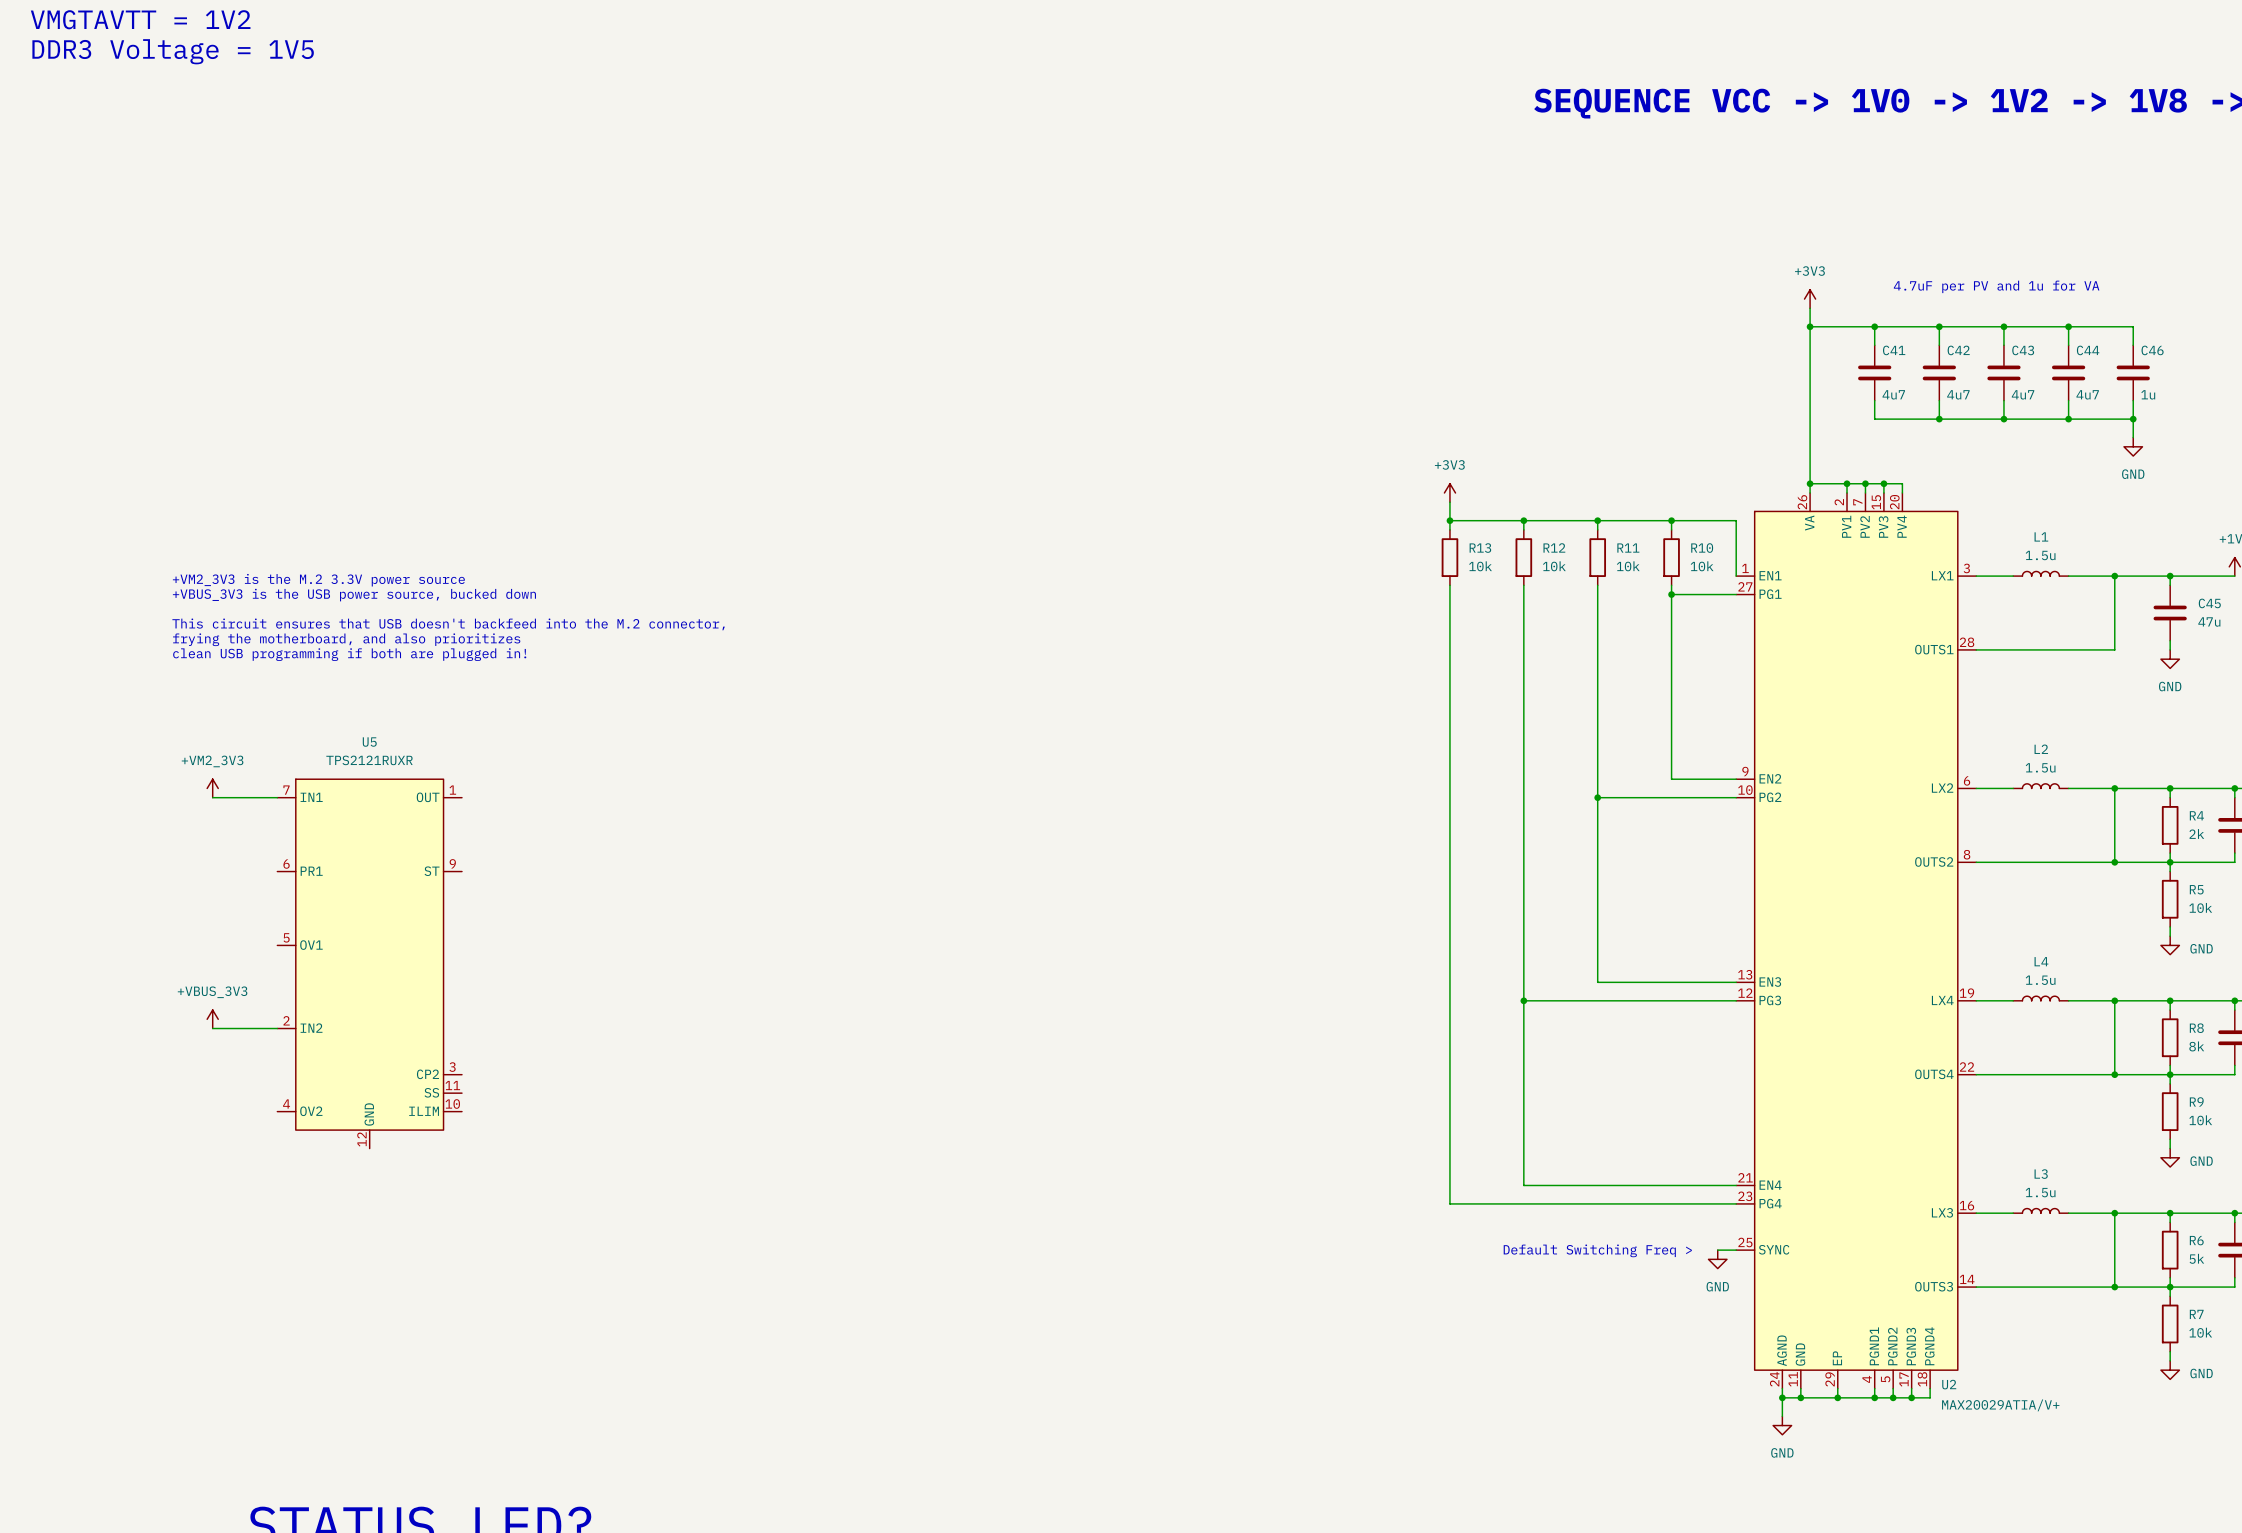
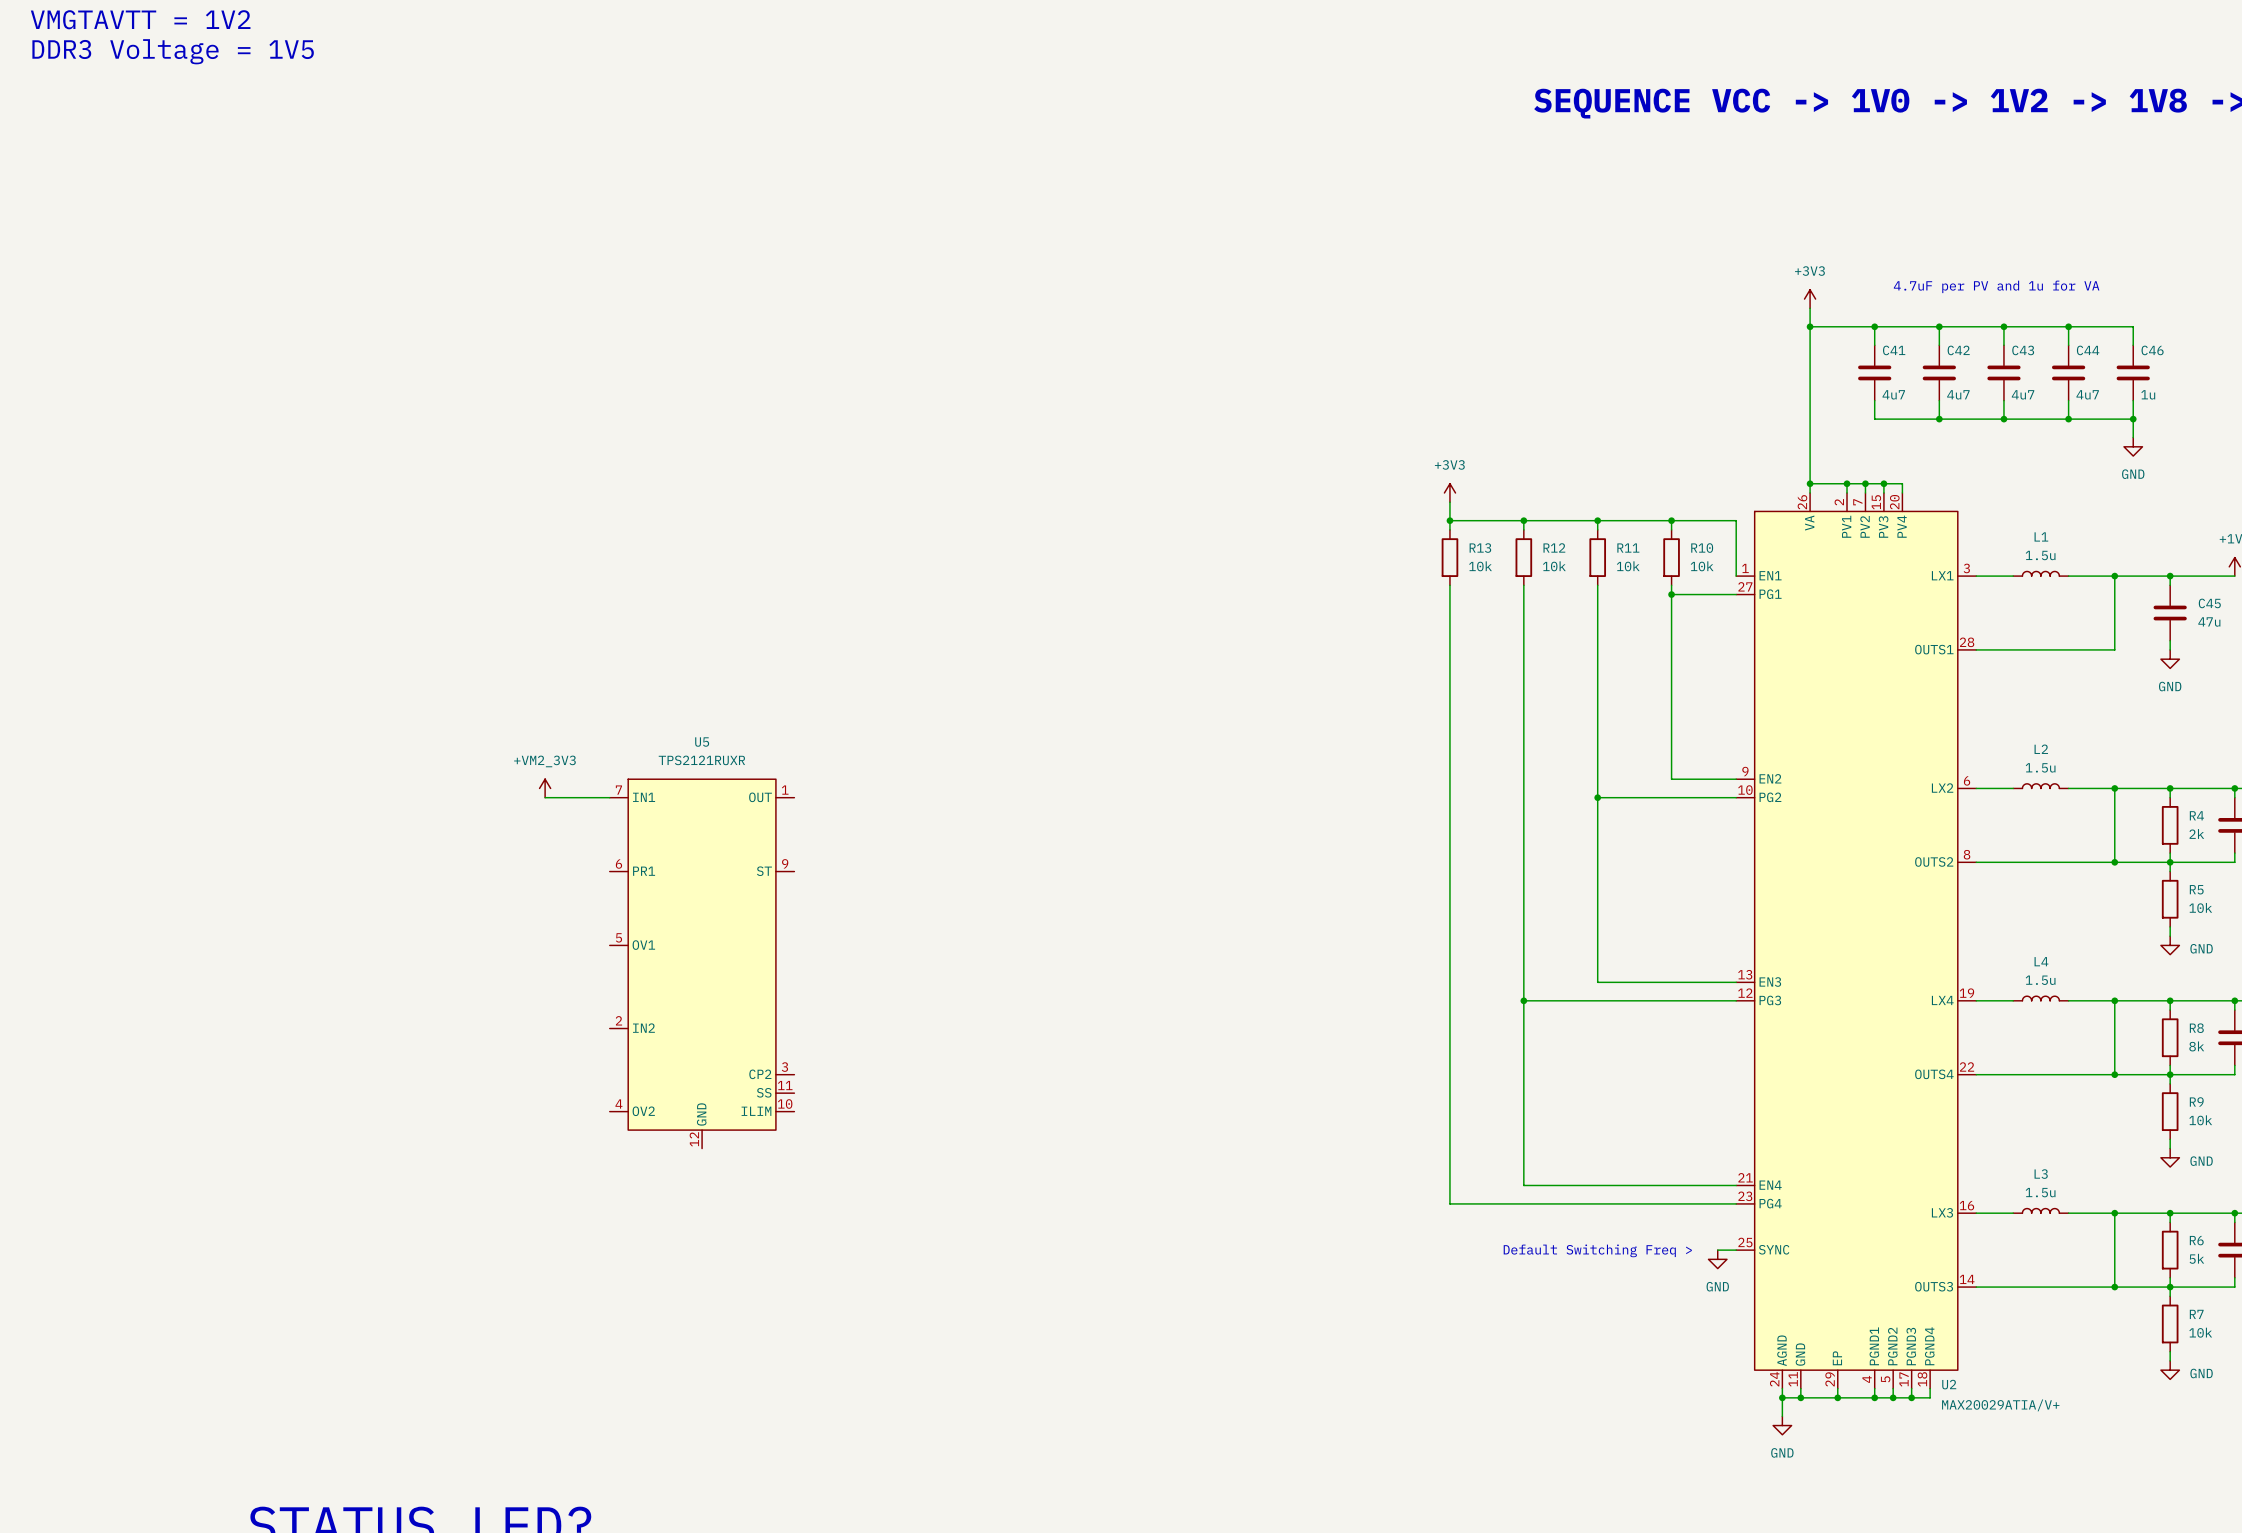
text: +VM2_3V3 is the M.2 3.3V power source (318, 580) -> none
text: +VBUS_3V3 is the USB power source, bucked down (354, 595) -> none
text: This circuit ensures that USB doesn't backfeed into the M.2 connector, (448, 624) -> none
text: frying the motherboard, and also prioritizes (346, 639) -> none
text: clean USB programming if both are plugged in! (349, 654) -> none
power symbol: +VM2_3V3 (212, 788) -> none
power symbol: none -> +VM2_3V3 (545, 788)
wire: (212, 797) (277, 797) -> none
wire: none -> (545, 797) (609, 797)
U5 position: (369, 963) -> (702, 963)
power symbol: +VBUS_3V3 (212, 1019) -> none
wire: (212, 1028) (277, 1028) -> none

